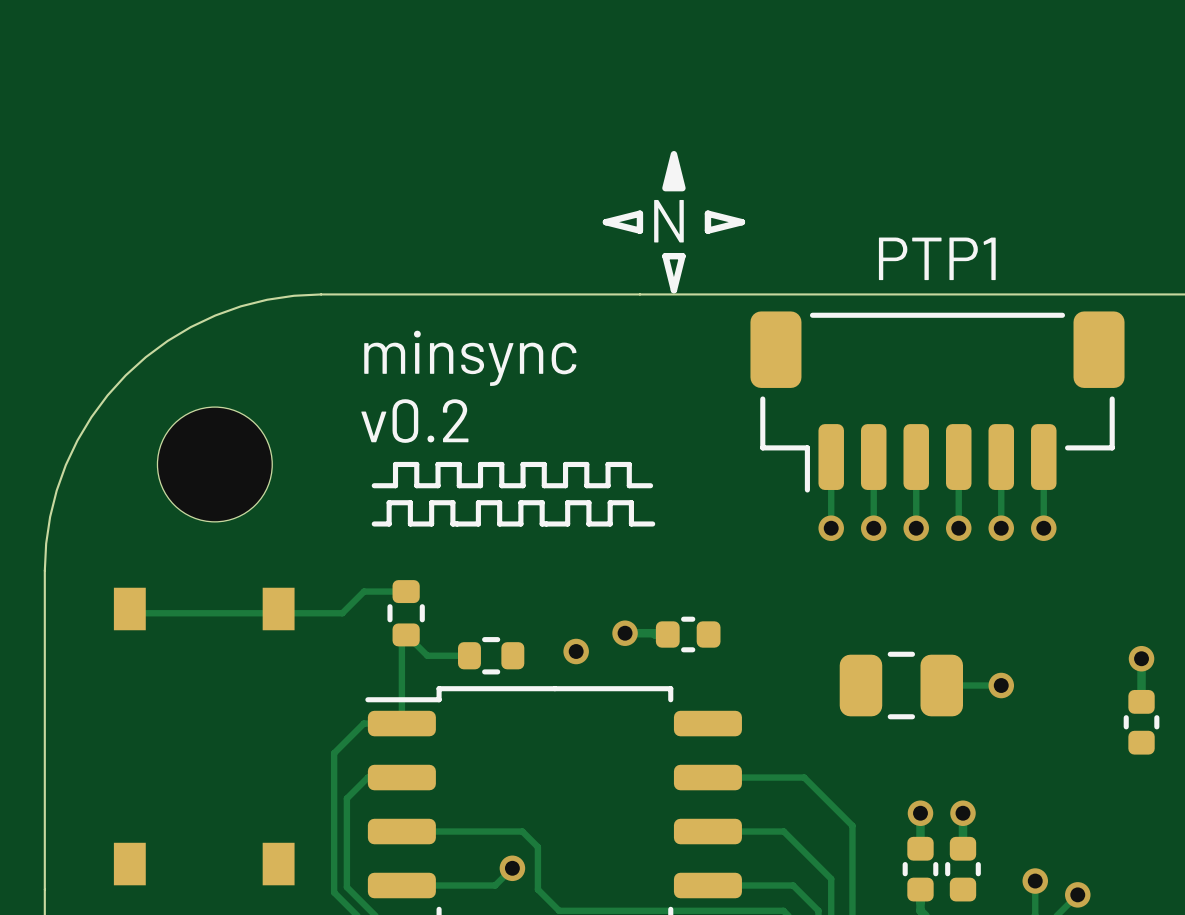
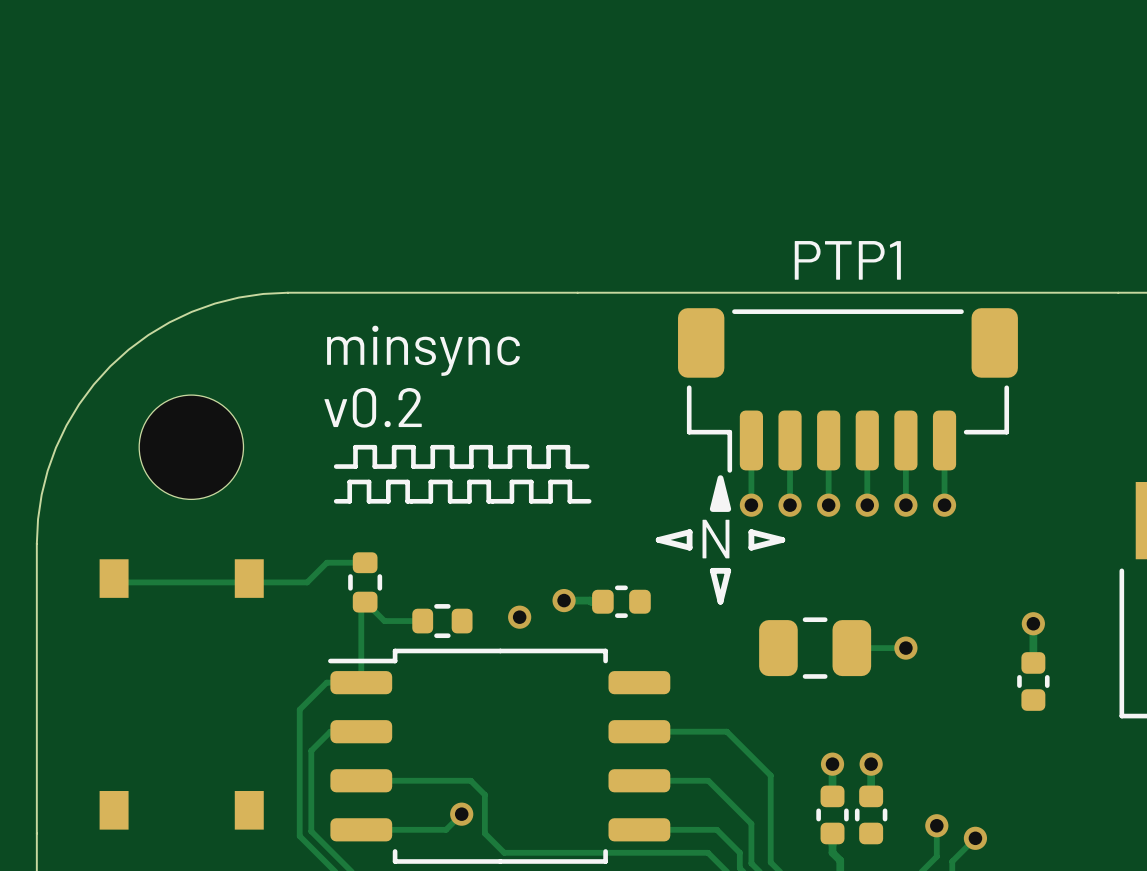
drawing position: (673, 171) -> (720, 493)
line: (639, 213) (639, 230) (605, 222) (639, 213) -> (689, 532) (689, 547) (658, 539) (689, 532)
line: (707, 213) (707, 230) (741, 222) (707, 213) -> (751, 532) (751, 547) (782, 539) (751, 532)
text position: N (668, 221) -> N (715, 539)
line: (665, 256) (682, 256) (673, 290) (665, 256) -> (712, 570) (728, 570) (720, 601) (712, 570)

